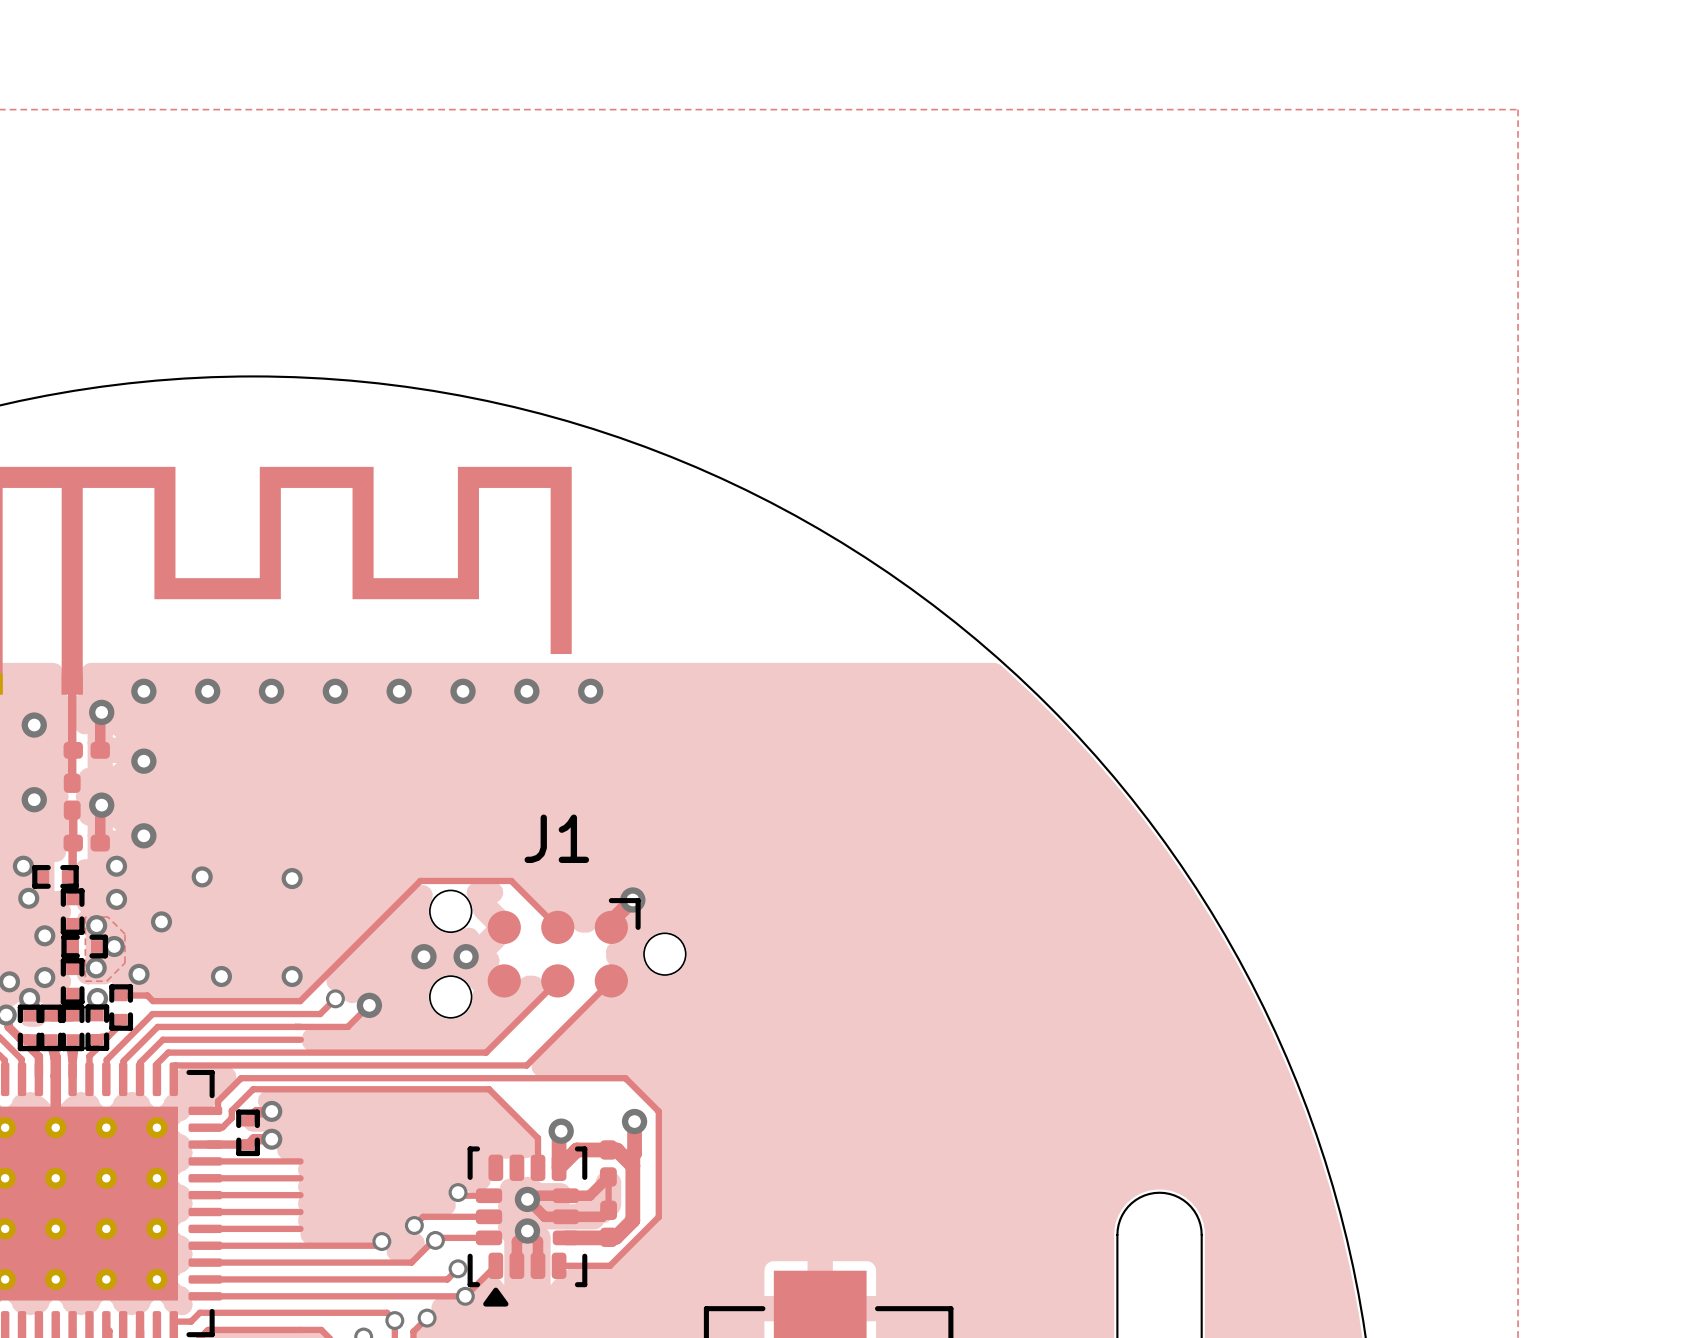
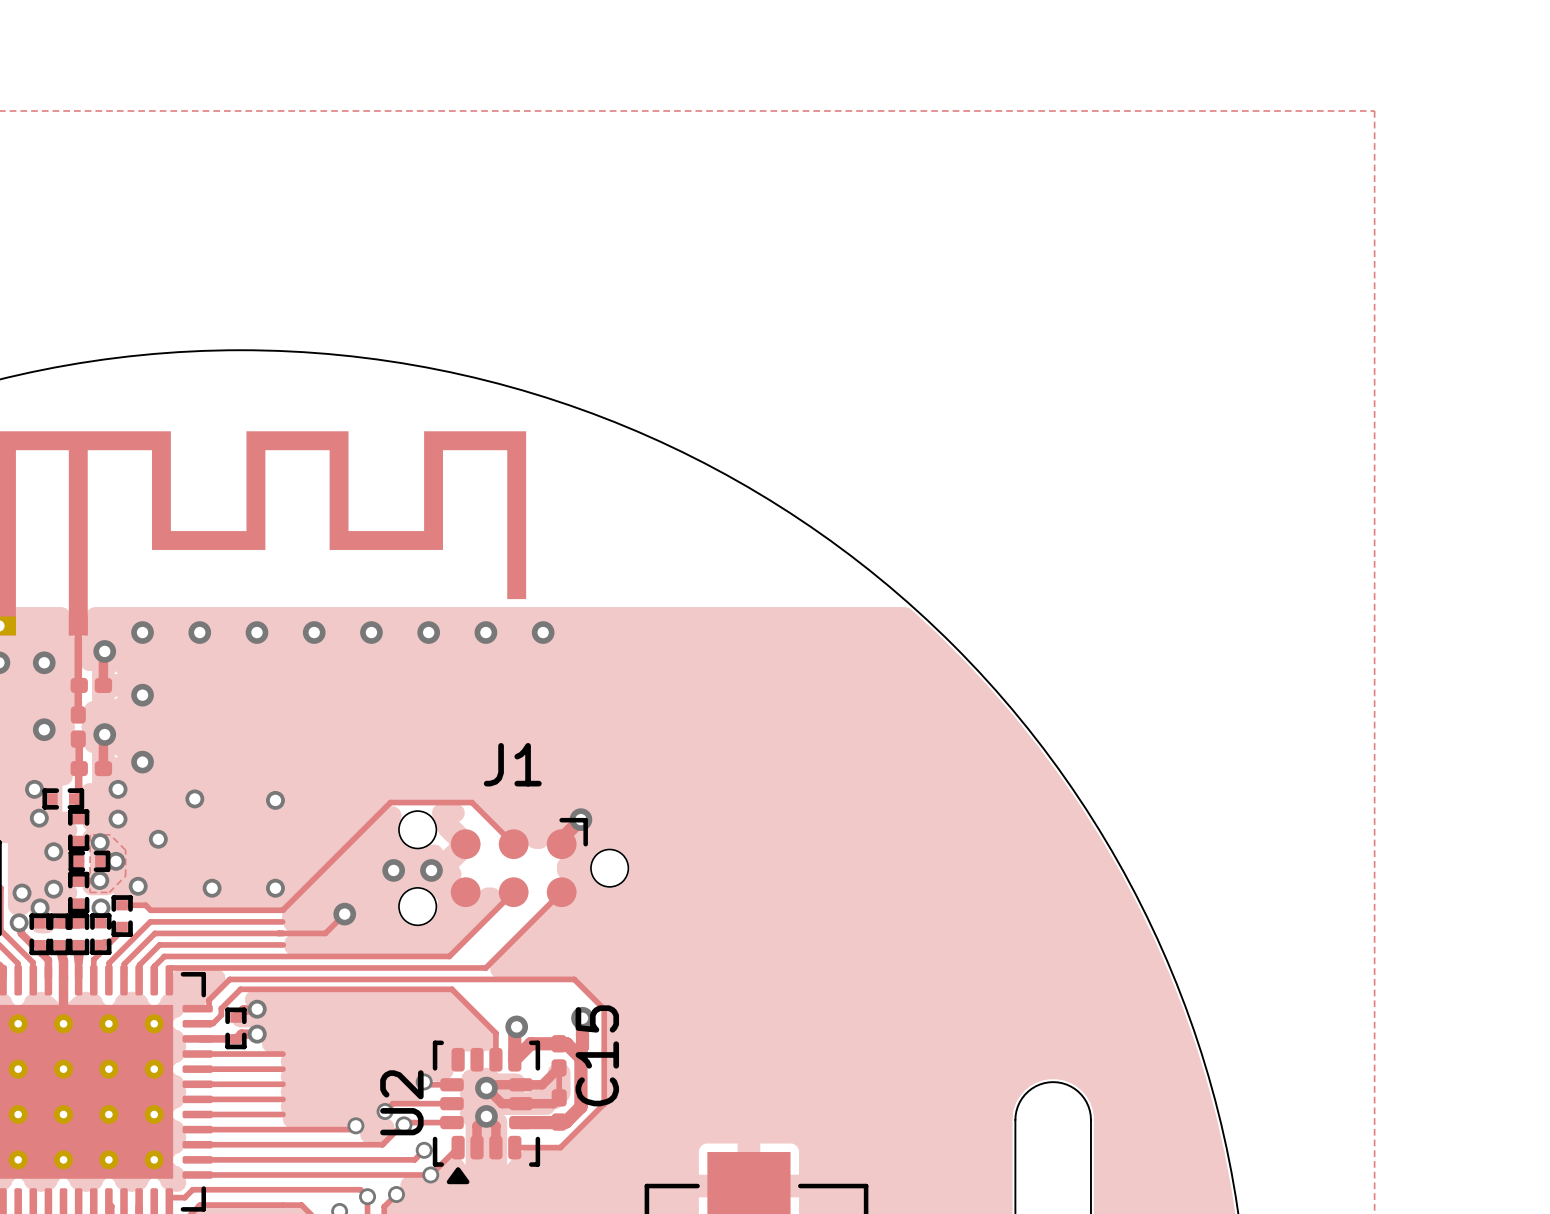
track: (335, 998) (320, 1014) (300, 1014) -> none
via: (335, 998) -> none
C15 name: none -> C15 (597, 1055)
U2 name: none -> U2 (401, 1102)

